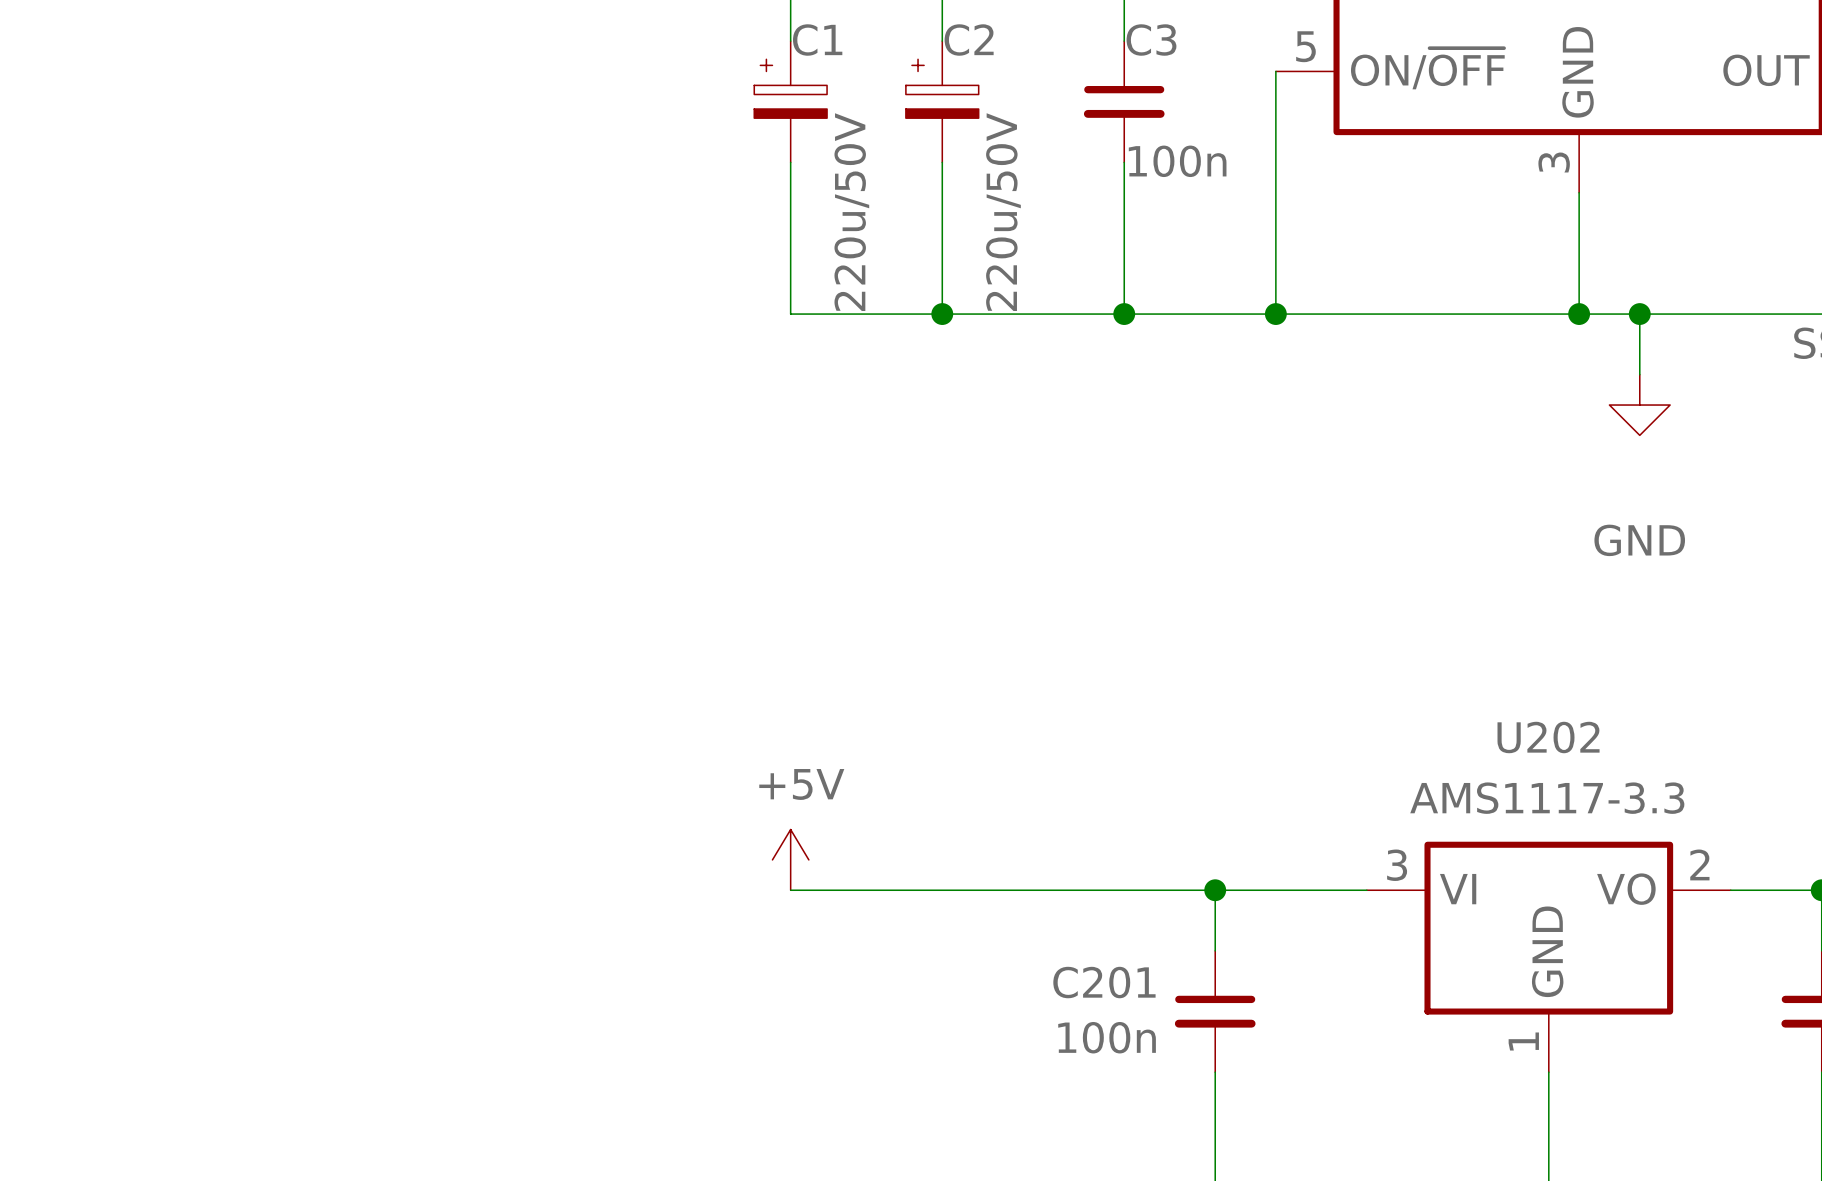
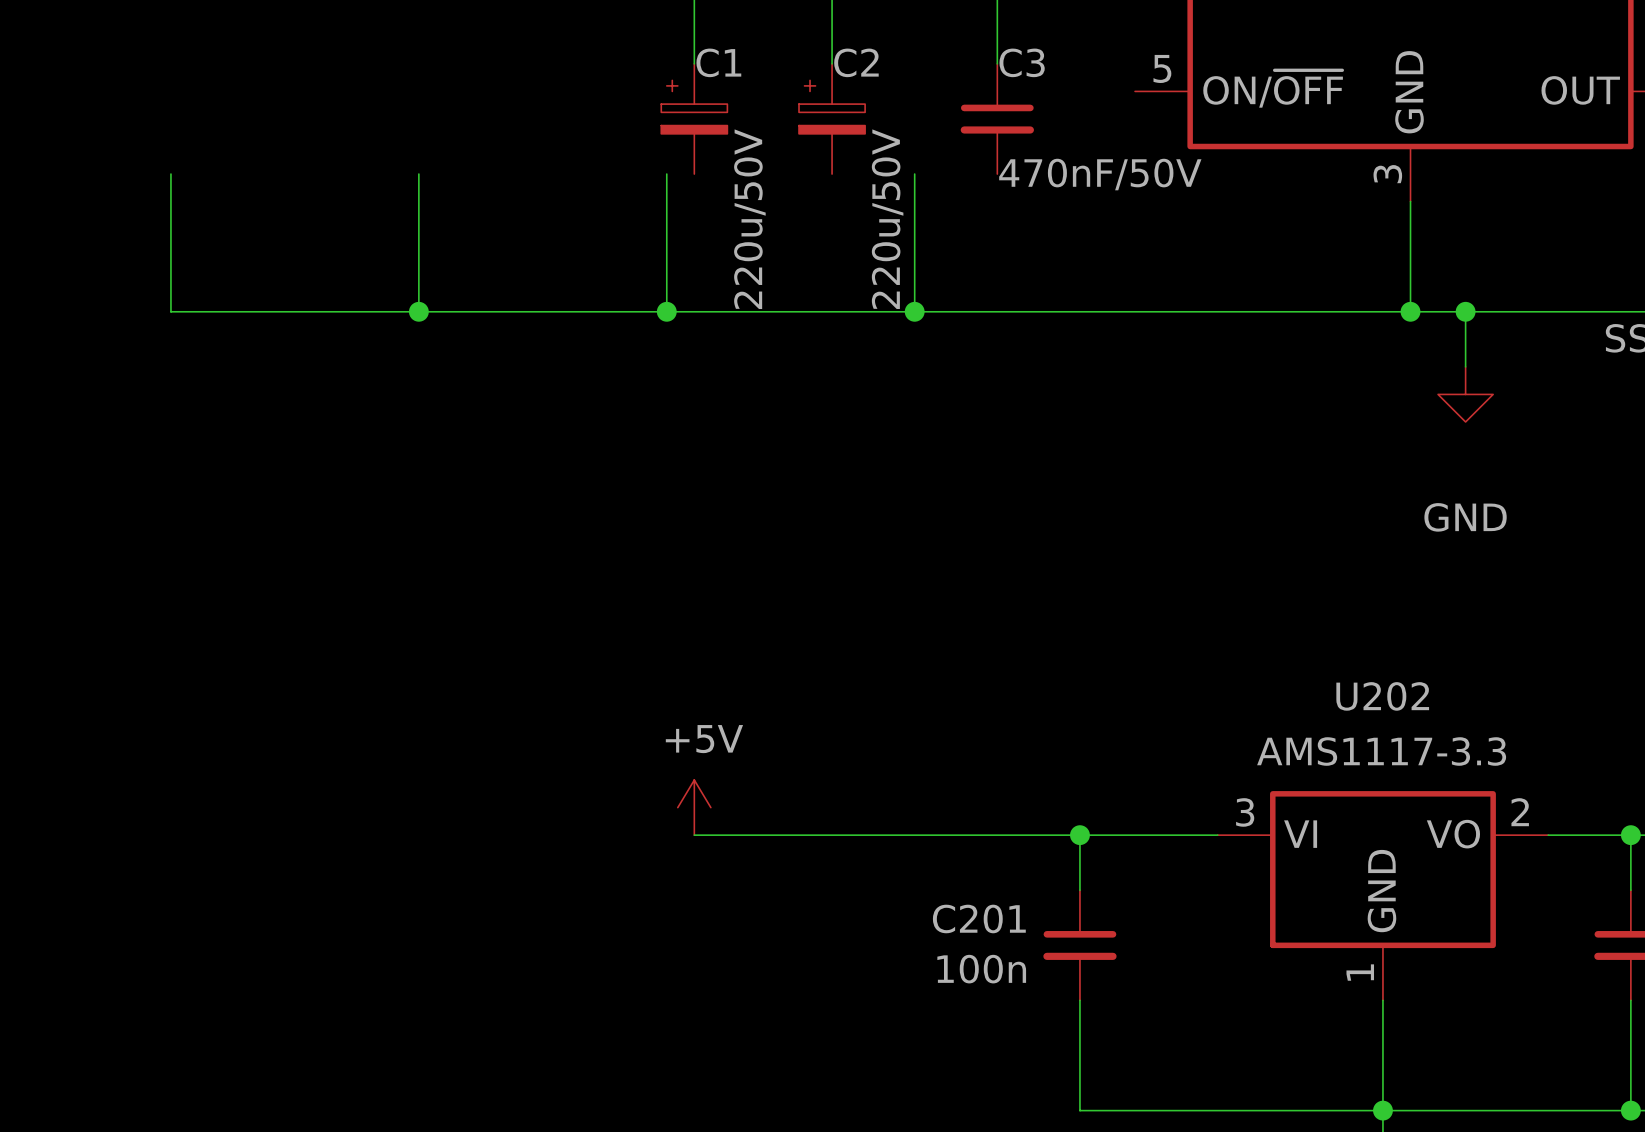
wire: (1275, 71) (1275, 314) -> none
C3 value: 100n (1177, 161) -> 470nF/50V (1100, 174)
wire: none -> (418, 174) (418, 311)
wire: (790, 162) (790, 314) -> (170, 174) (170, 311) (694, 311)
wire: (942, 162) (942, 314) -> (914, 174) (914, 311)
wire: (1124, 162) (1124, 314) -> (666, 174) (666, 311)
junction: none -> (418, 311)
junction: none -> (666, 311)
junction: (942, 314) -> none
junction: none -> (914, 311)
junction: (1124, 314) -> none
junction: (1275, 314) -> none

